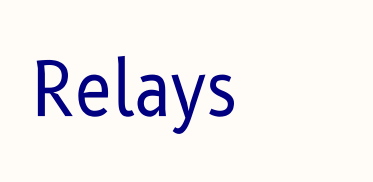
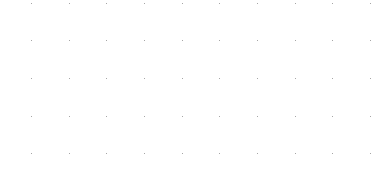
text: Relays (135, 94) -> none

